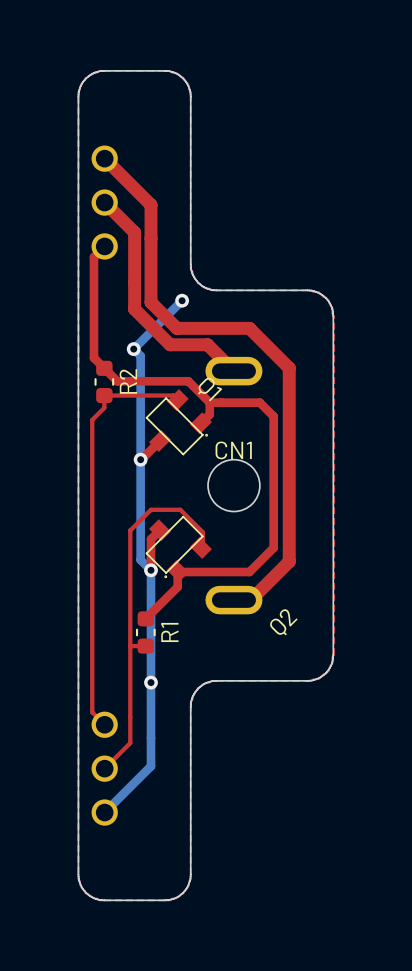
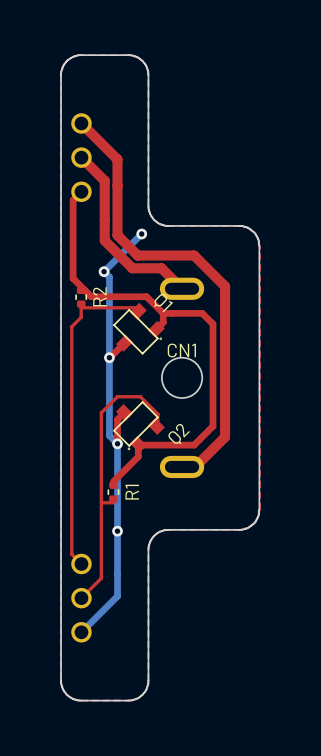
R2 footprint: [94, 360, 115, 404] -> [75, 286, 88, 308]
R1 footprint: [135, 611, 156, 654] -> [107, 481, 120, 503]
Q2 name position: Q2 (283, 622) -> Q2 (179, 434)

